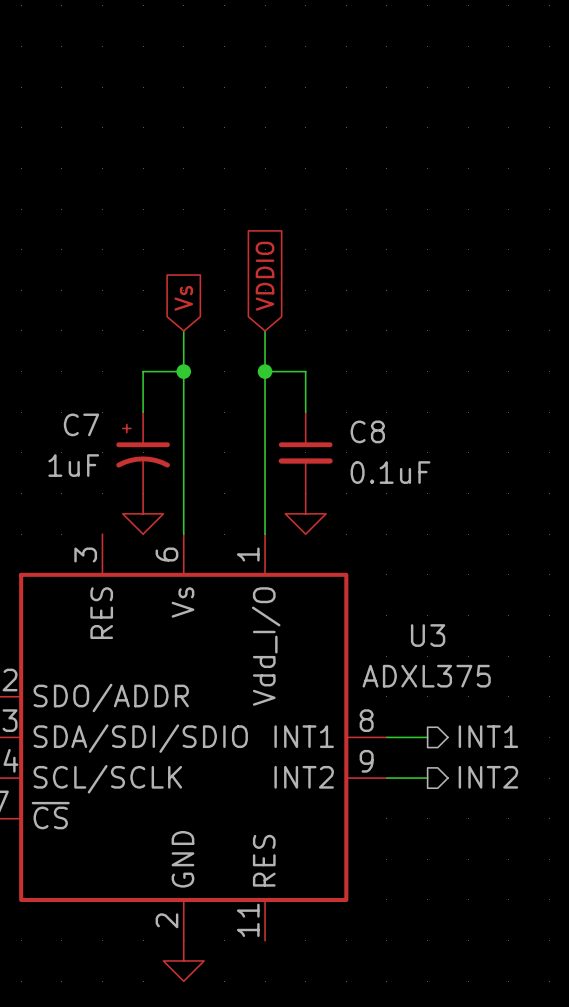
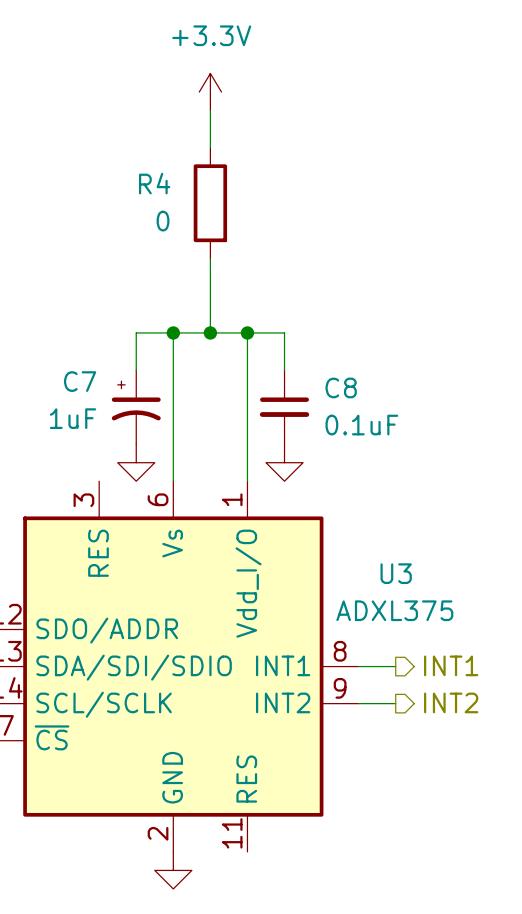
power symbol: none -> +3.3V (210, 92)
R4: none -> 0 (210, 203)
global label: VDDIO (265, 276) -> none
wire: none -> (210, 258) (210, 332)
global label: Vs (183, 298) -> none
wire: (183, 330) (183, 371) -> (247, 332) (173, 332)
wire: (265, 330) (265, 371) -> (210, 110) (210, 147)
junction: none -> (210, 332)

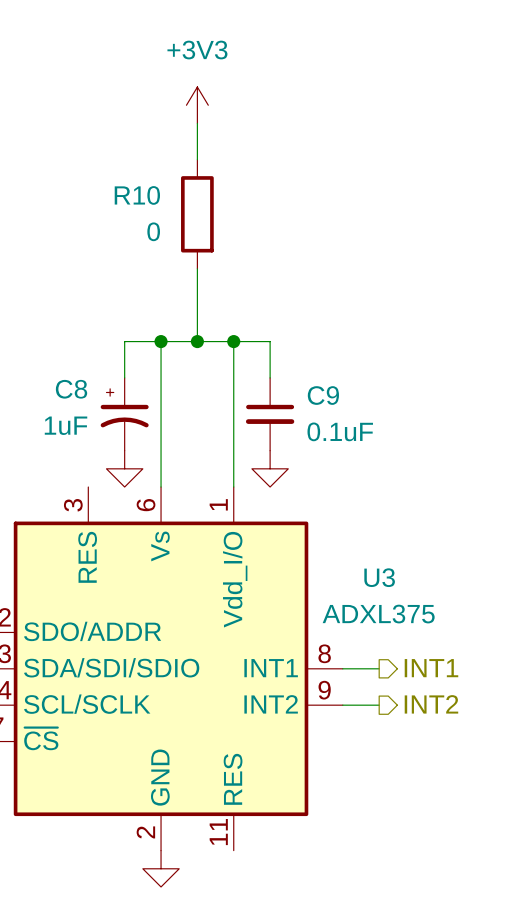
power symbol: +3.3V (210, 92) -> +3V3 (197, 105)
R4 name: R4 (154, 183) -> R10 (137, 195)
C7 name: C7 (80, 381) -> C8 (71, 389)
C8 name: C8 (341, 387) -> C9 (323, 395)

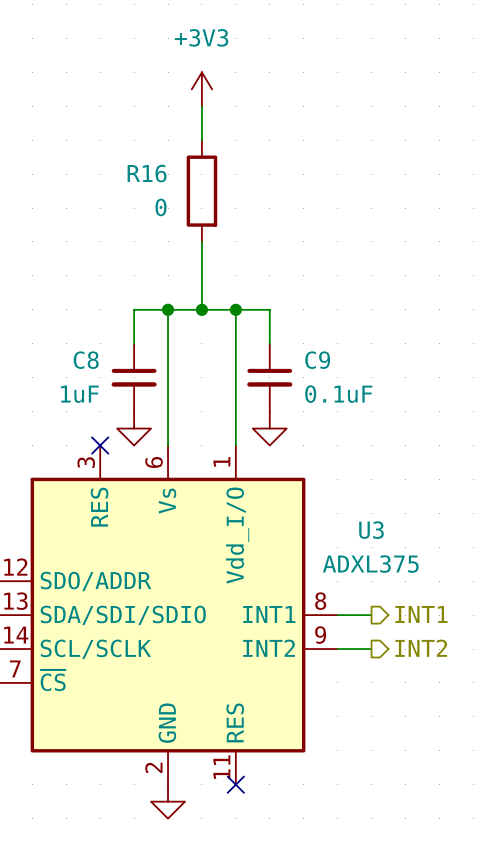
R10 name: R10 (137, 195) -> R16 (147, 173)
C8 symbol: [100, 377, 149, 451] -> [111, 343, 157, 412]
no-connect mark: none -> (100, 445)
no-connect mark: none -> (235, 784)

